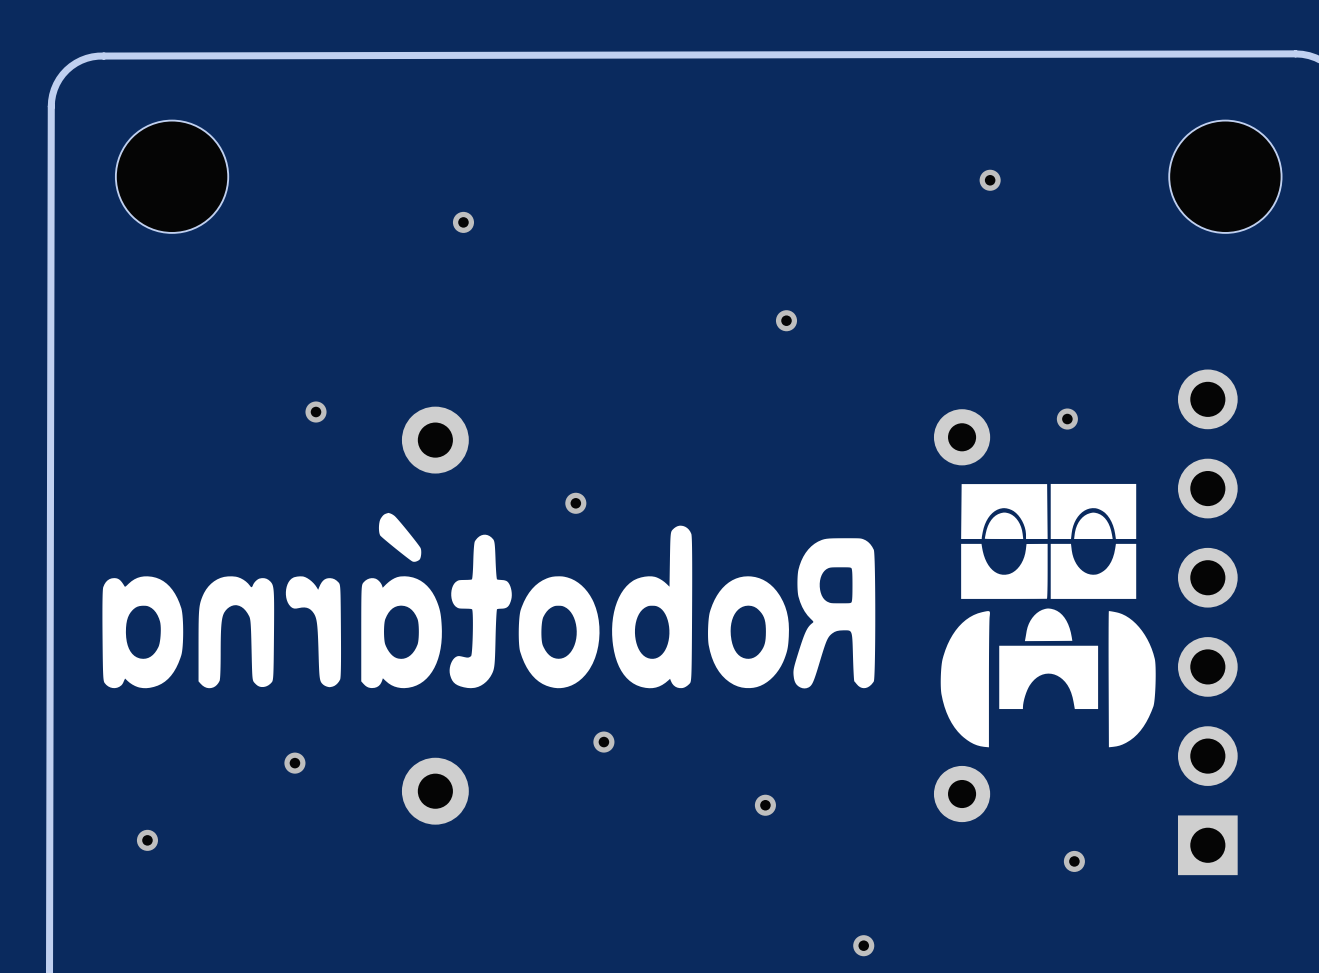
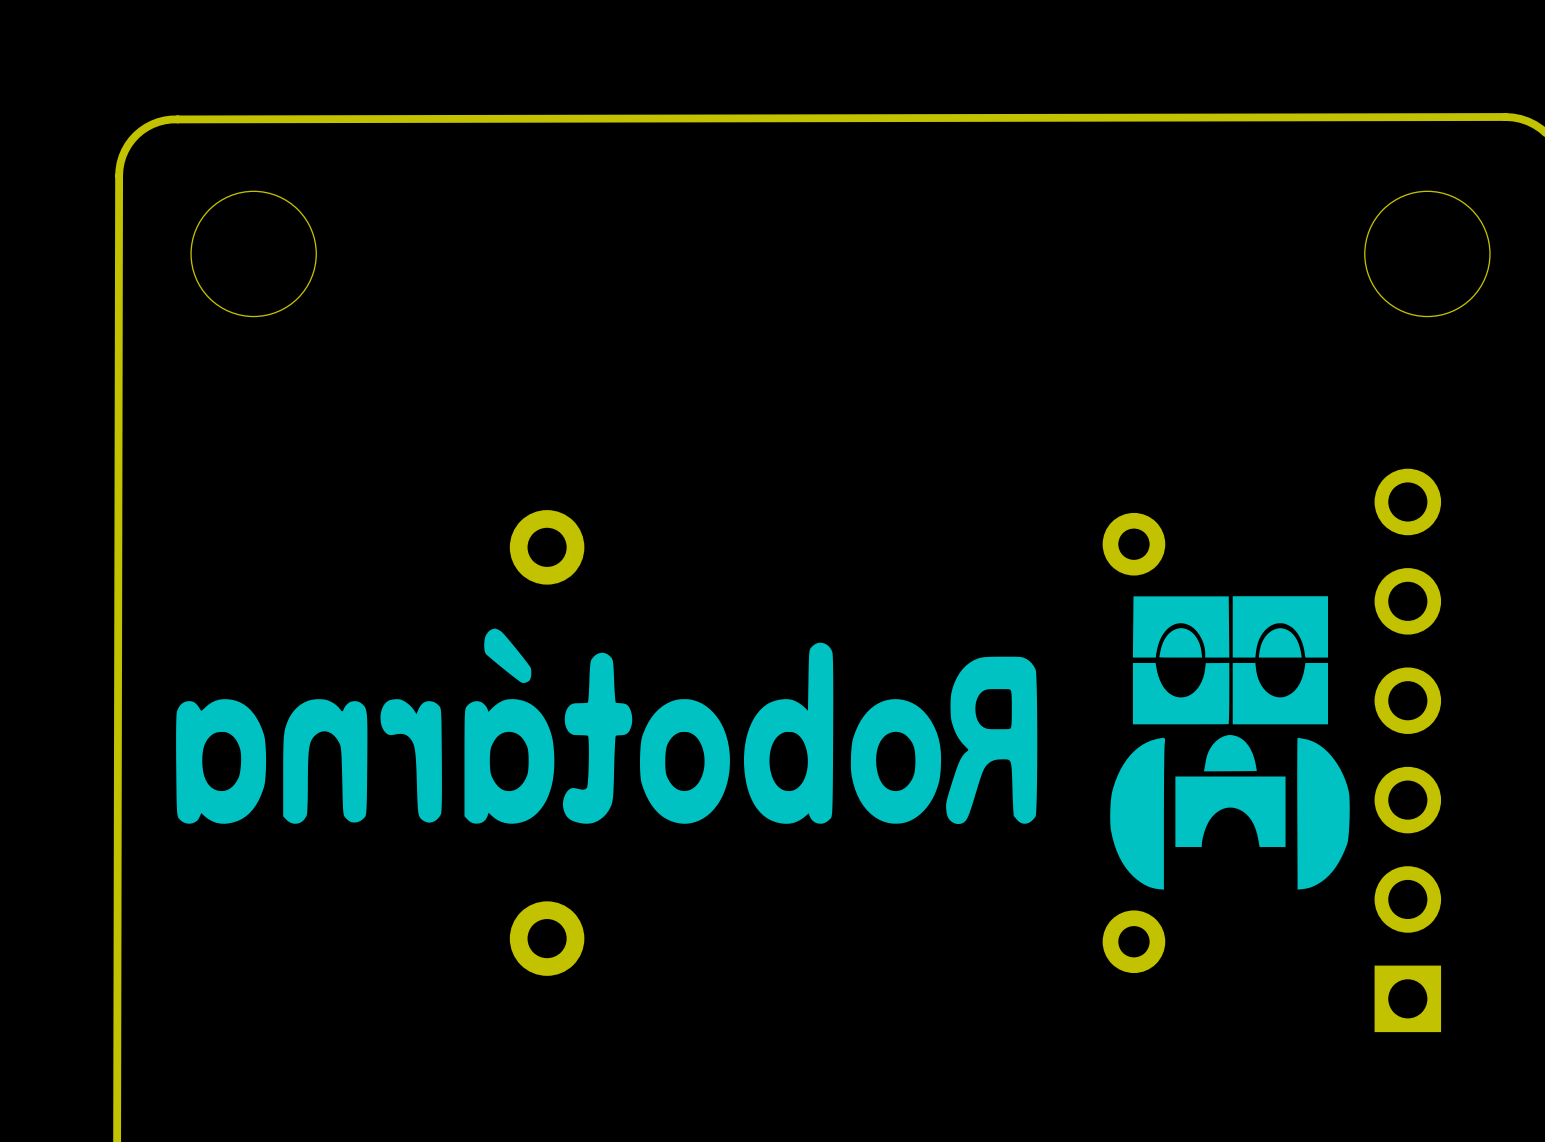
via: (990, 180) -> none
via: (463, 222) -> none
via: (786, 320) -> none
via: (316, 412) -> none
via: (1067, 419) -> none
via: (575, 503) -> none
via: (603, 742) -> none
via: (294, 763) -> none
via: (765, 805) -> none
via: (147, 840) -> none
via: (1074, 861) -> none
via: (863, 945) -> none

